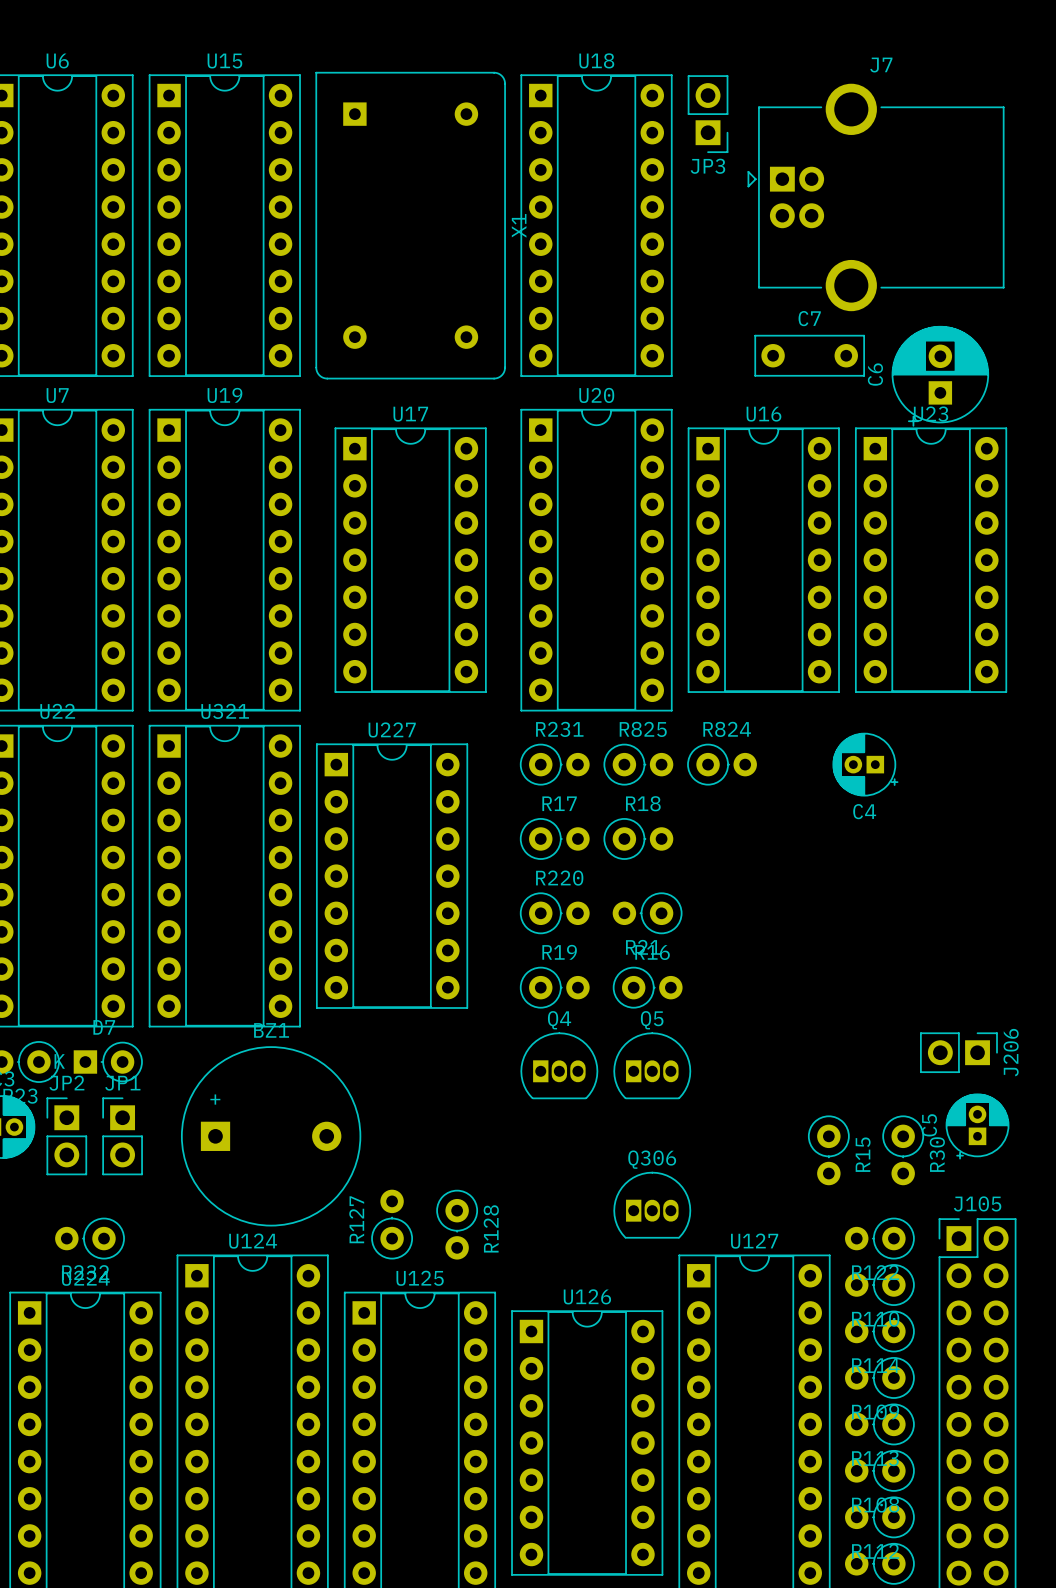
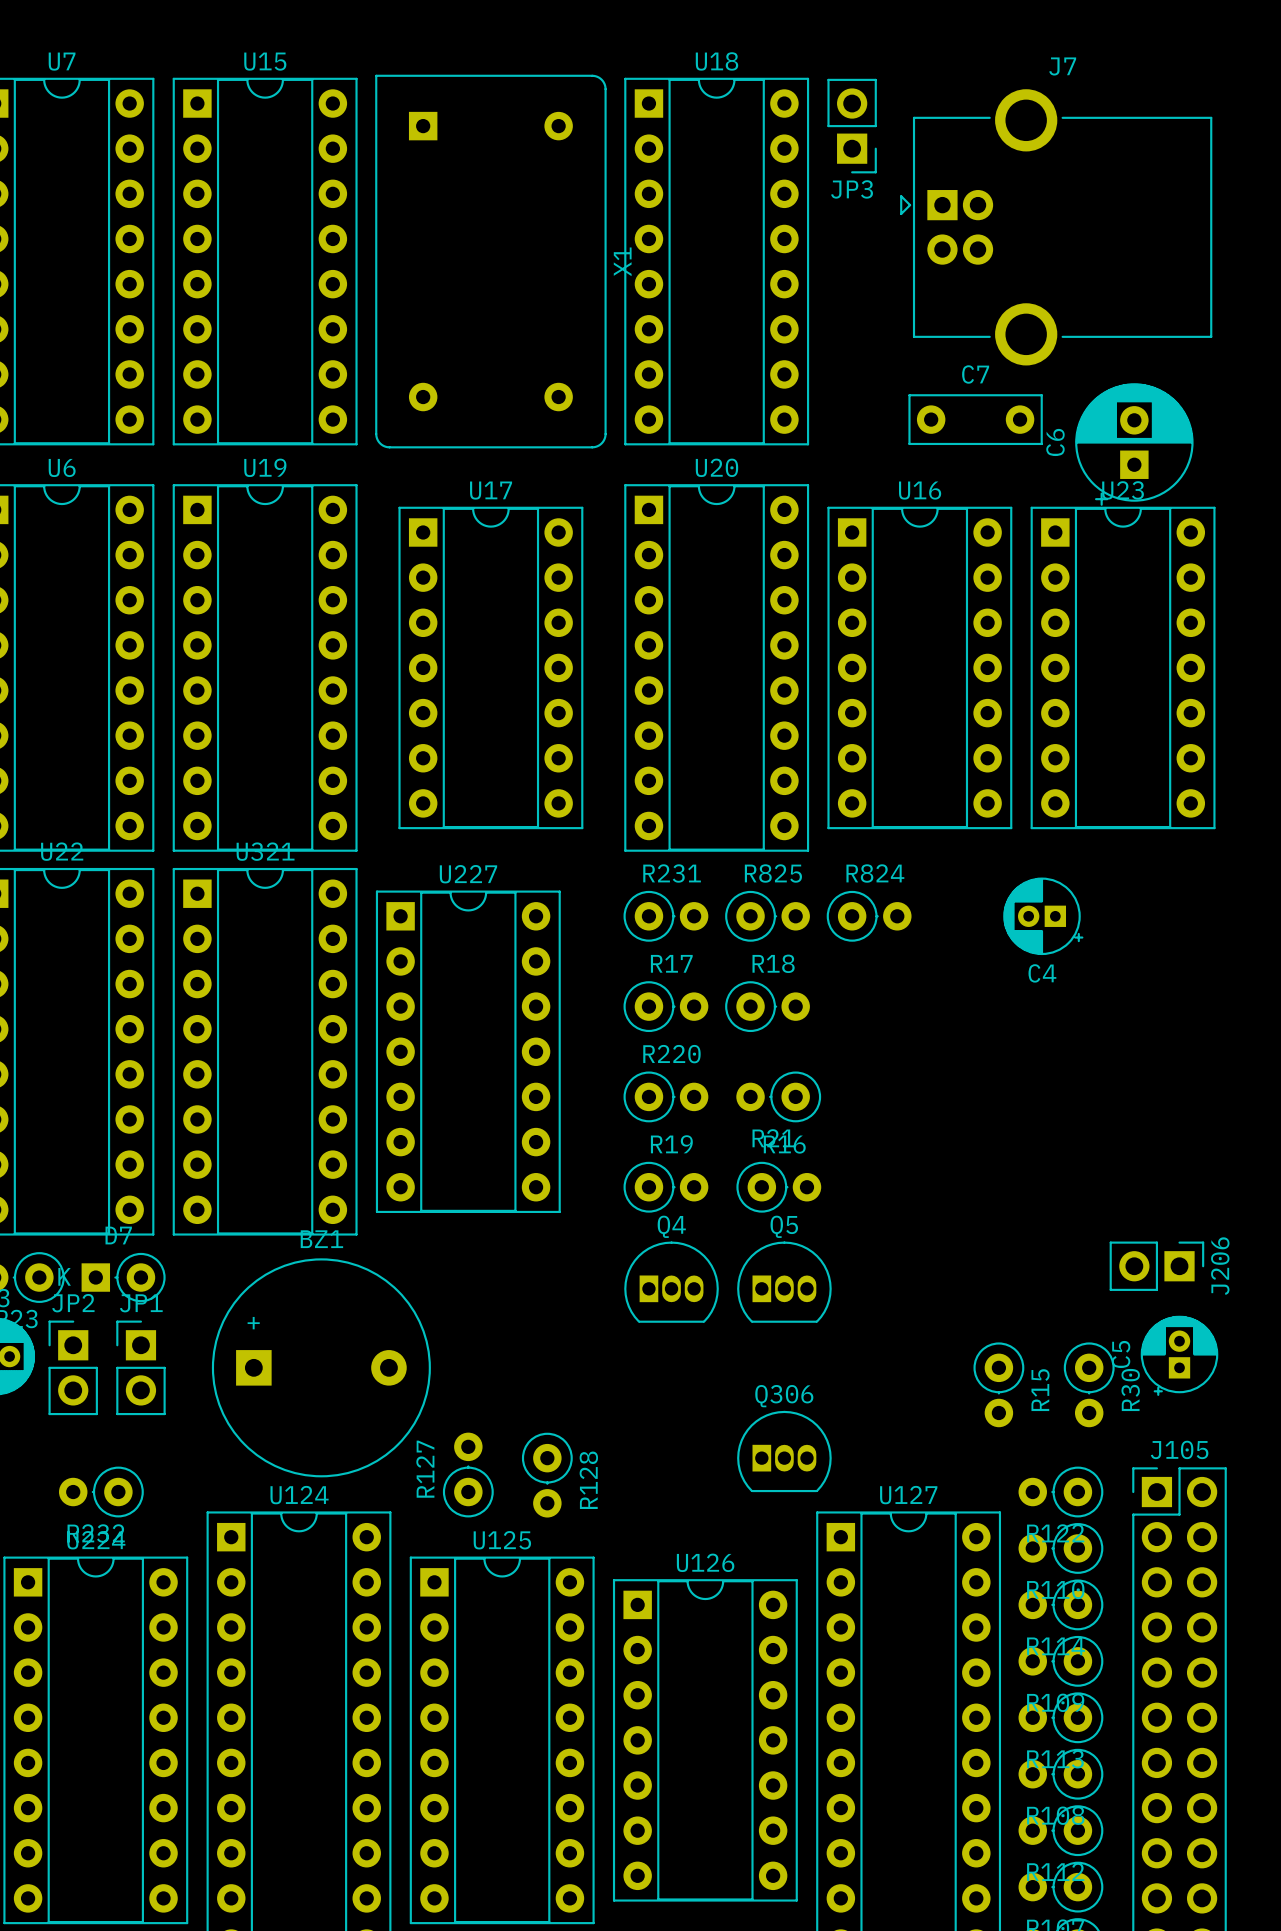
U6 name: U6 (57, 61) -> U7 (62, 61)
U7 name: U7 (57, 395) -> U6 (62, 467)

